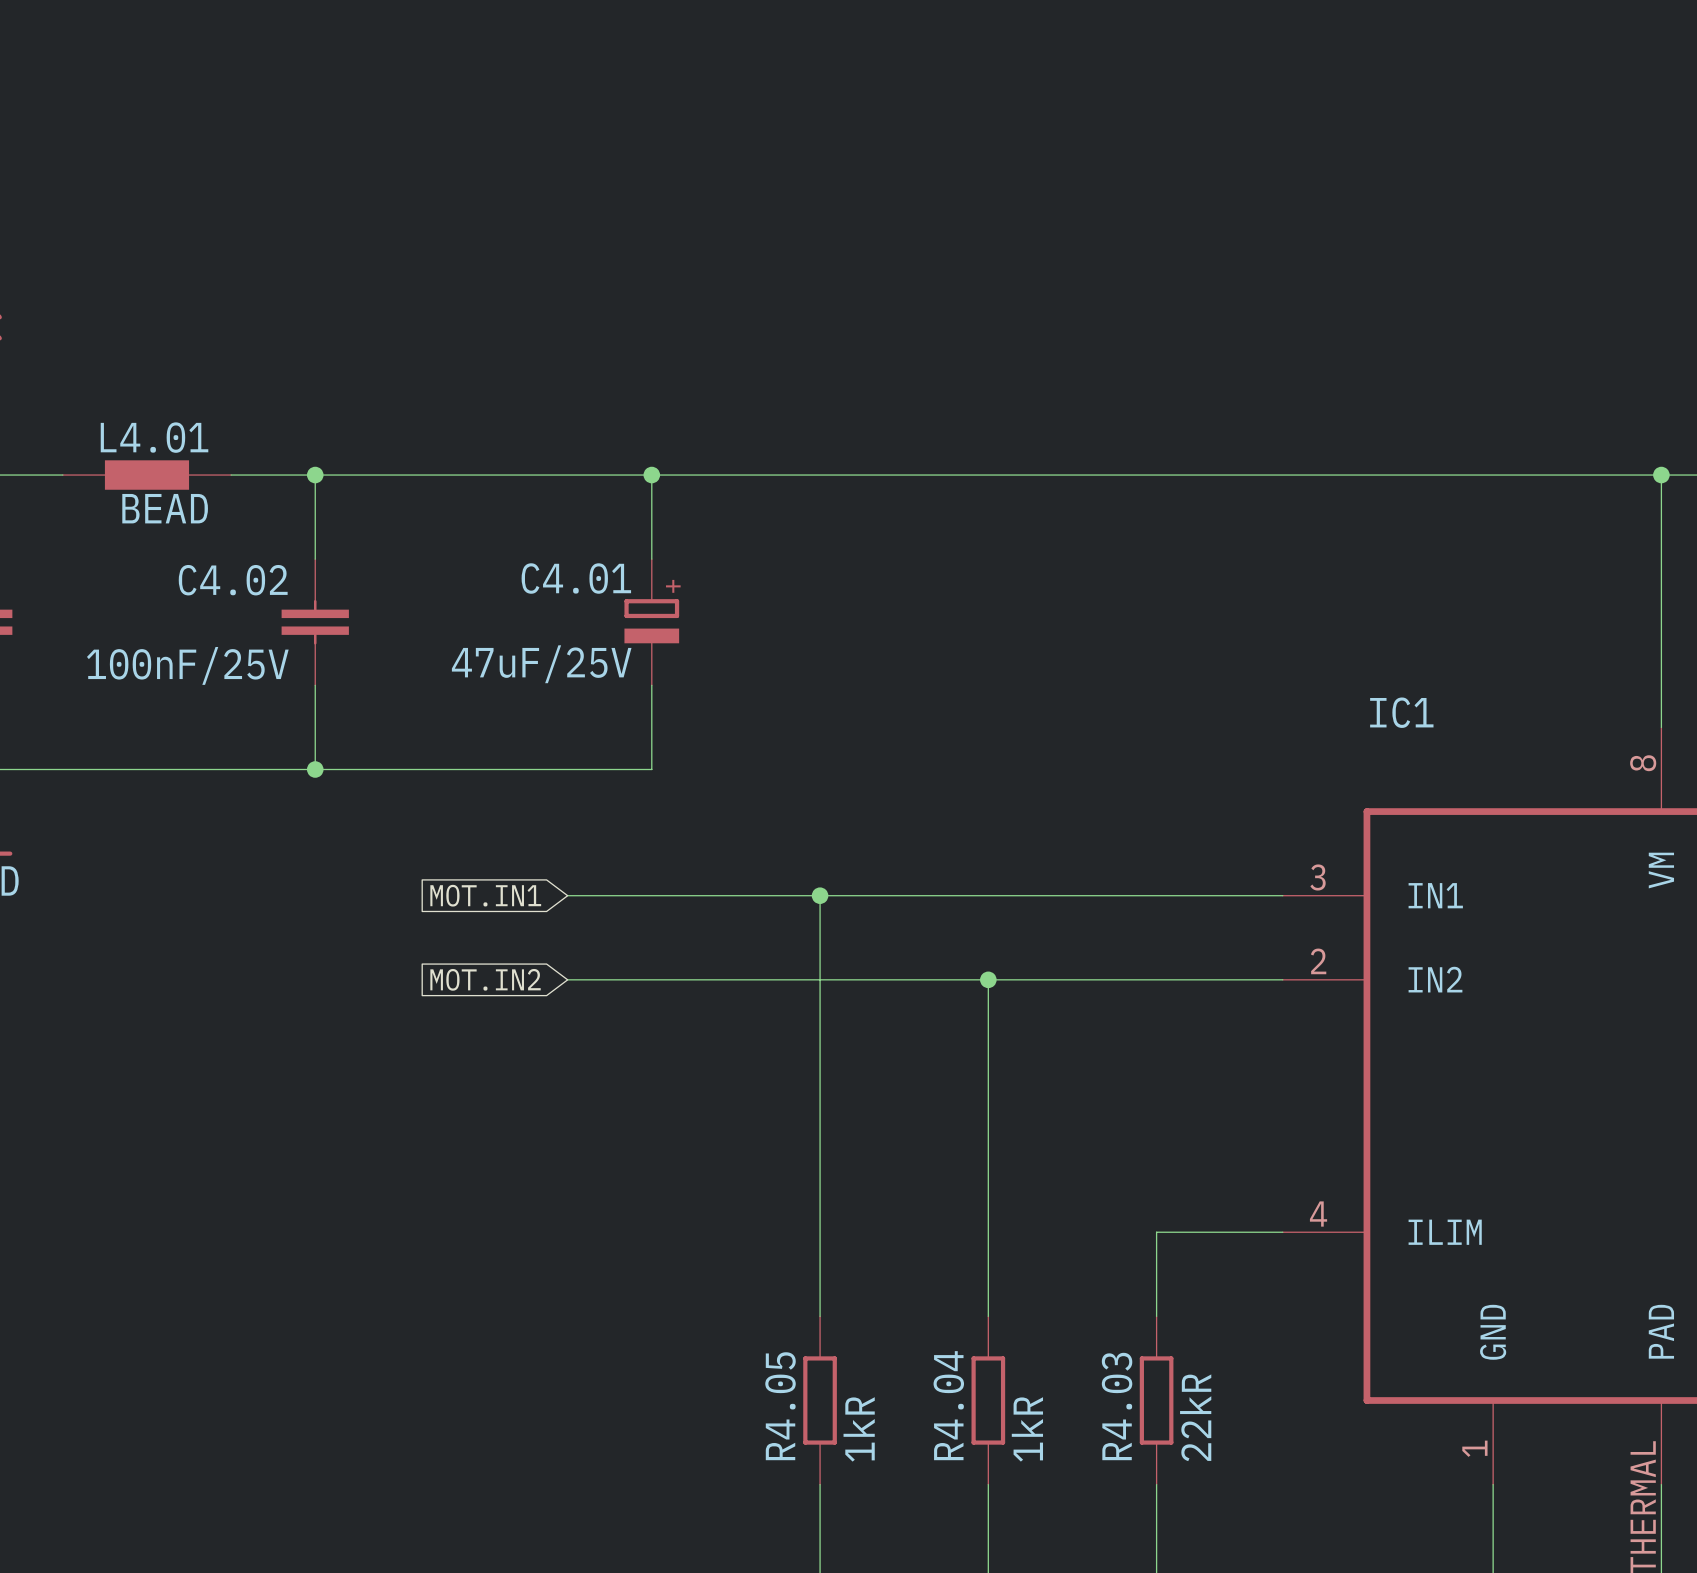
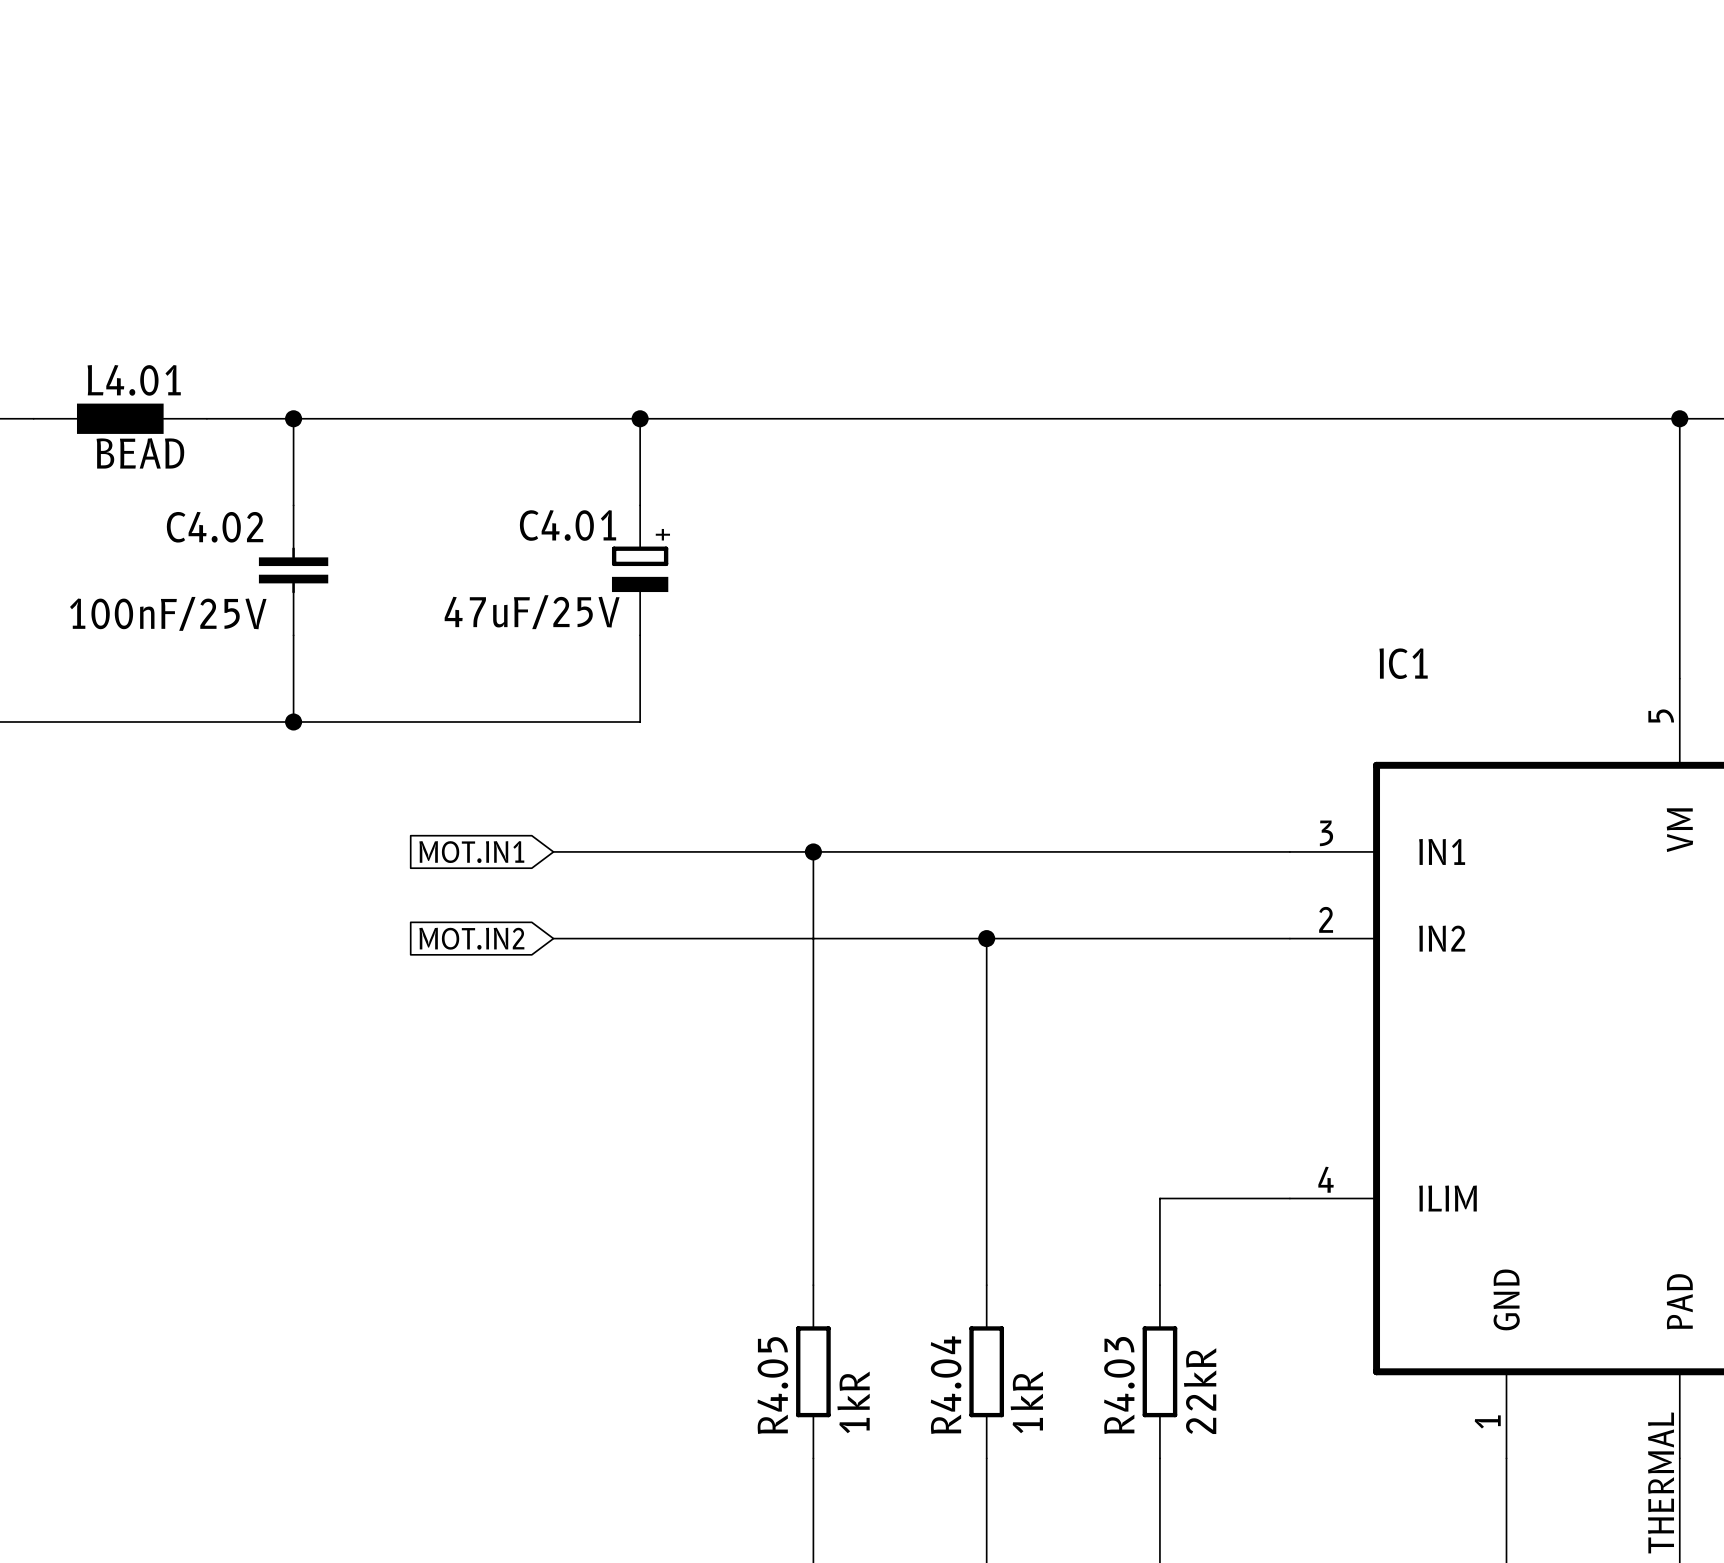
IC1 pin number: 8 (1643, 763) -> 5 (1661, 715)

